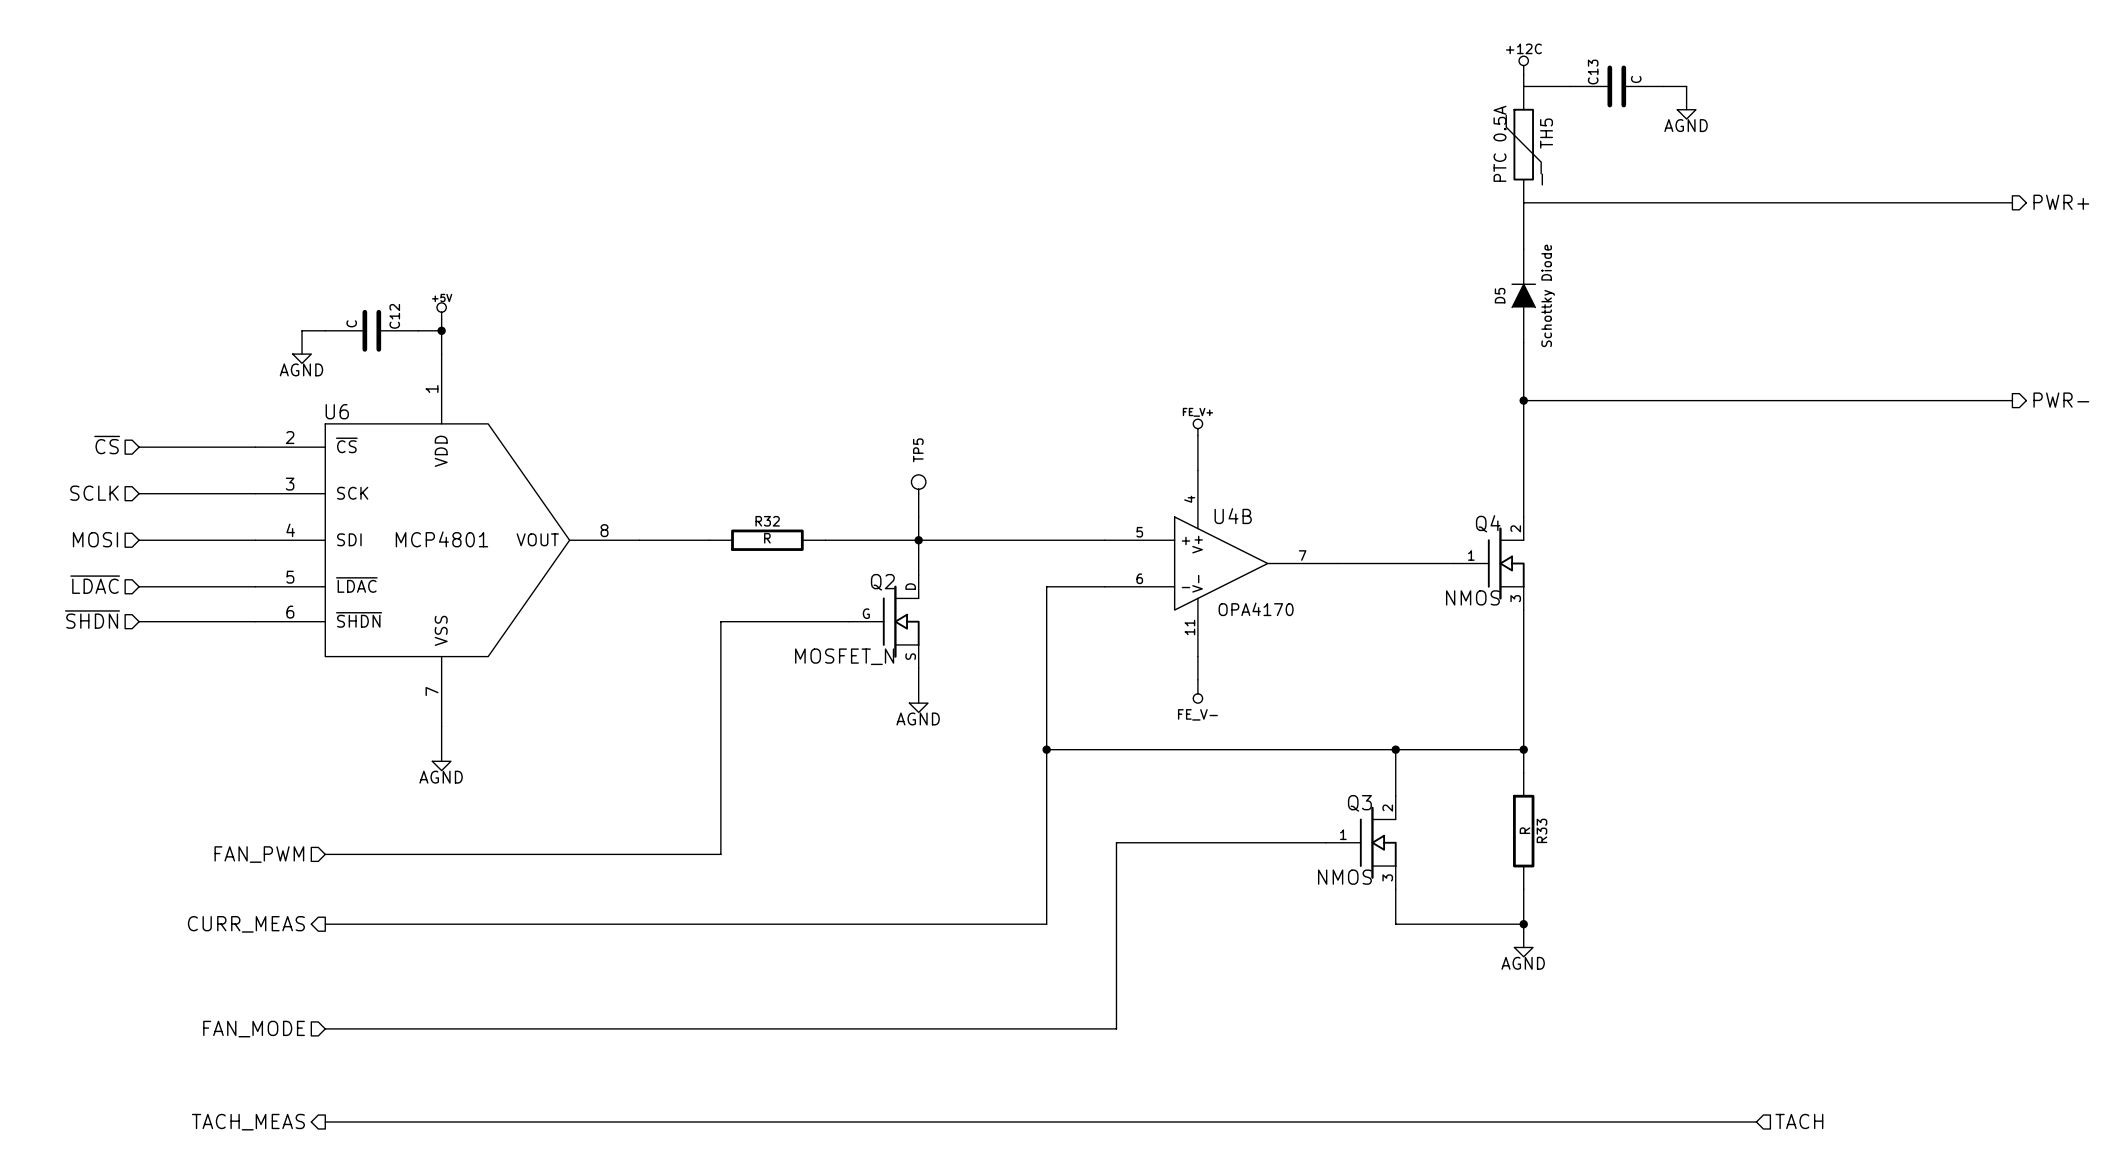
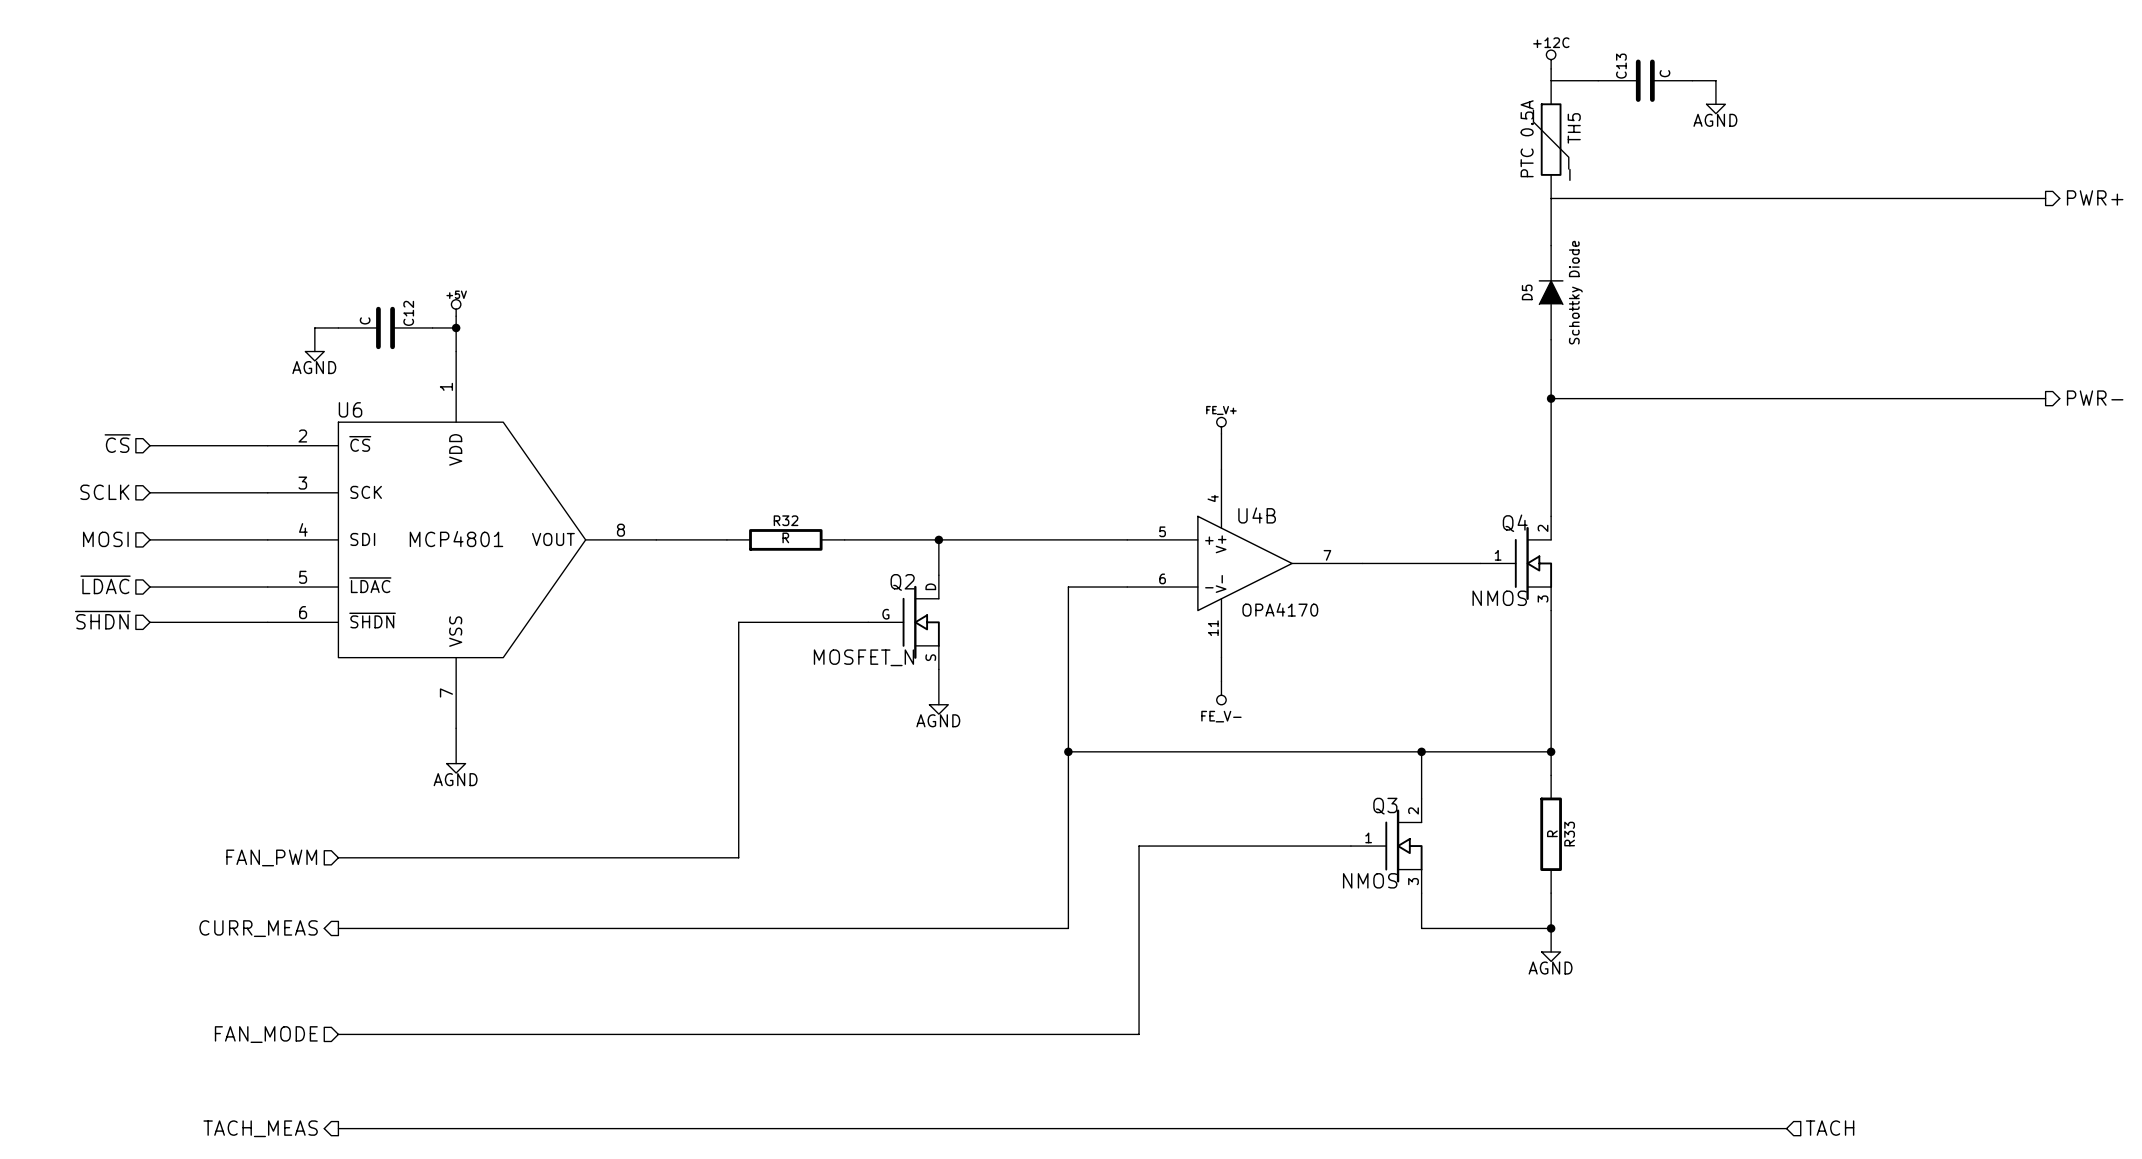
TP5: (918, 495) -> none
wire: (918, 516) (918, 540) -> none

